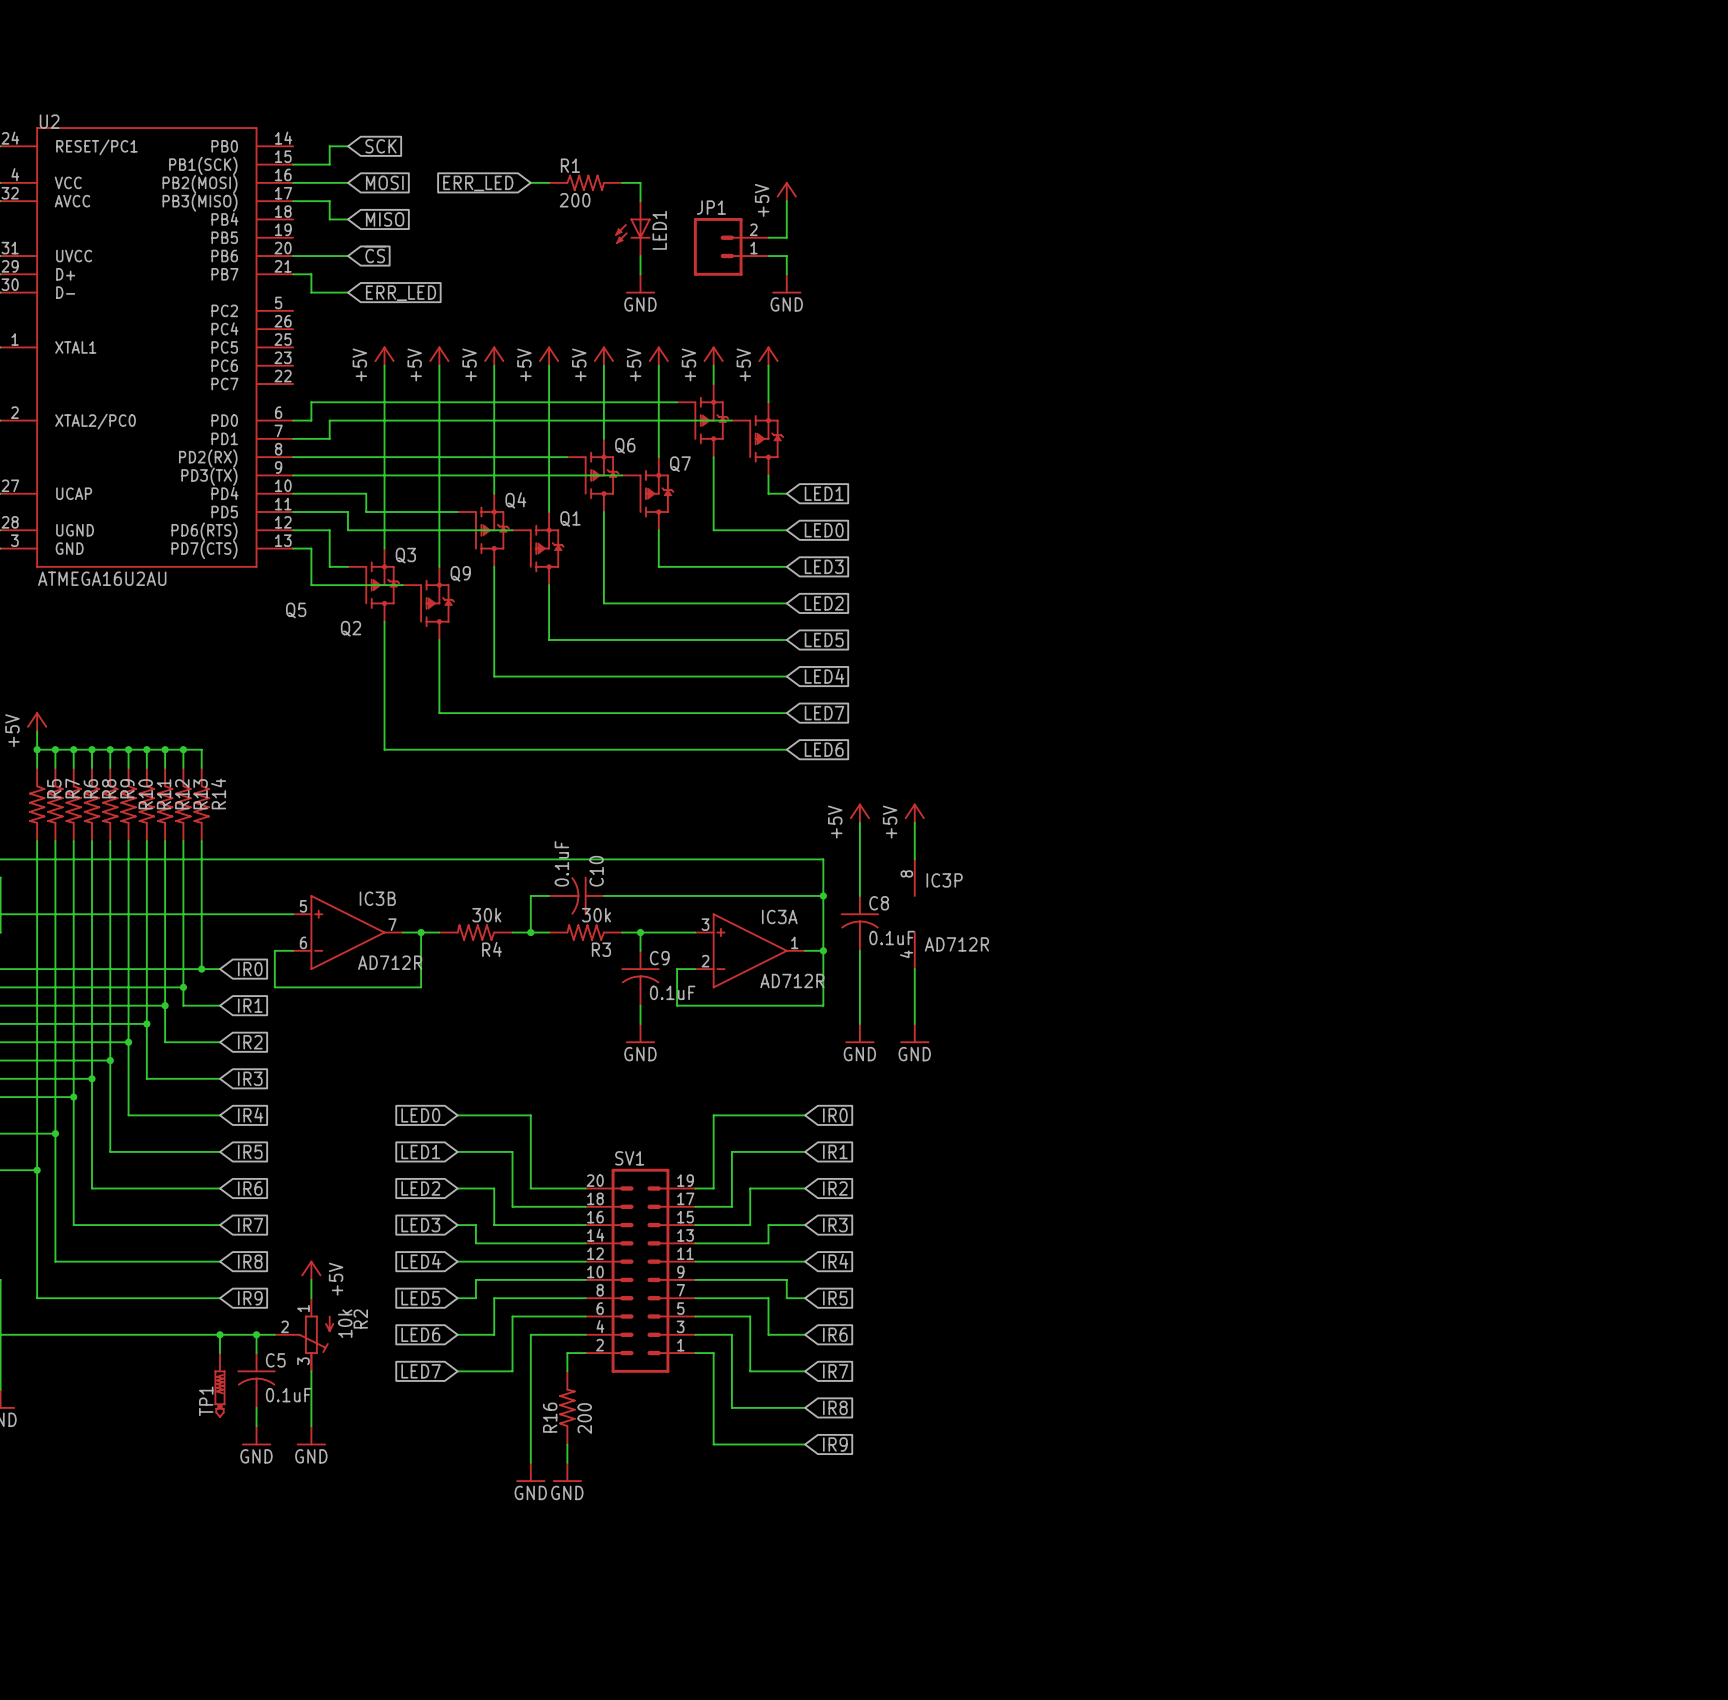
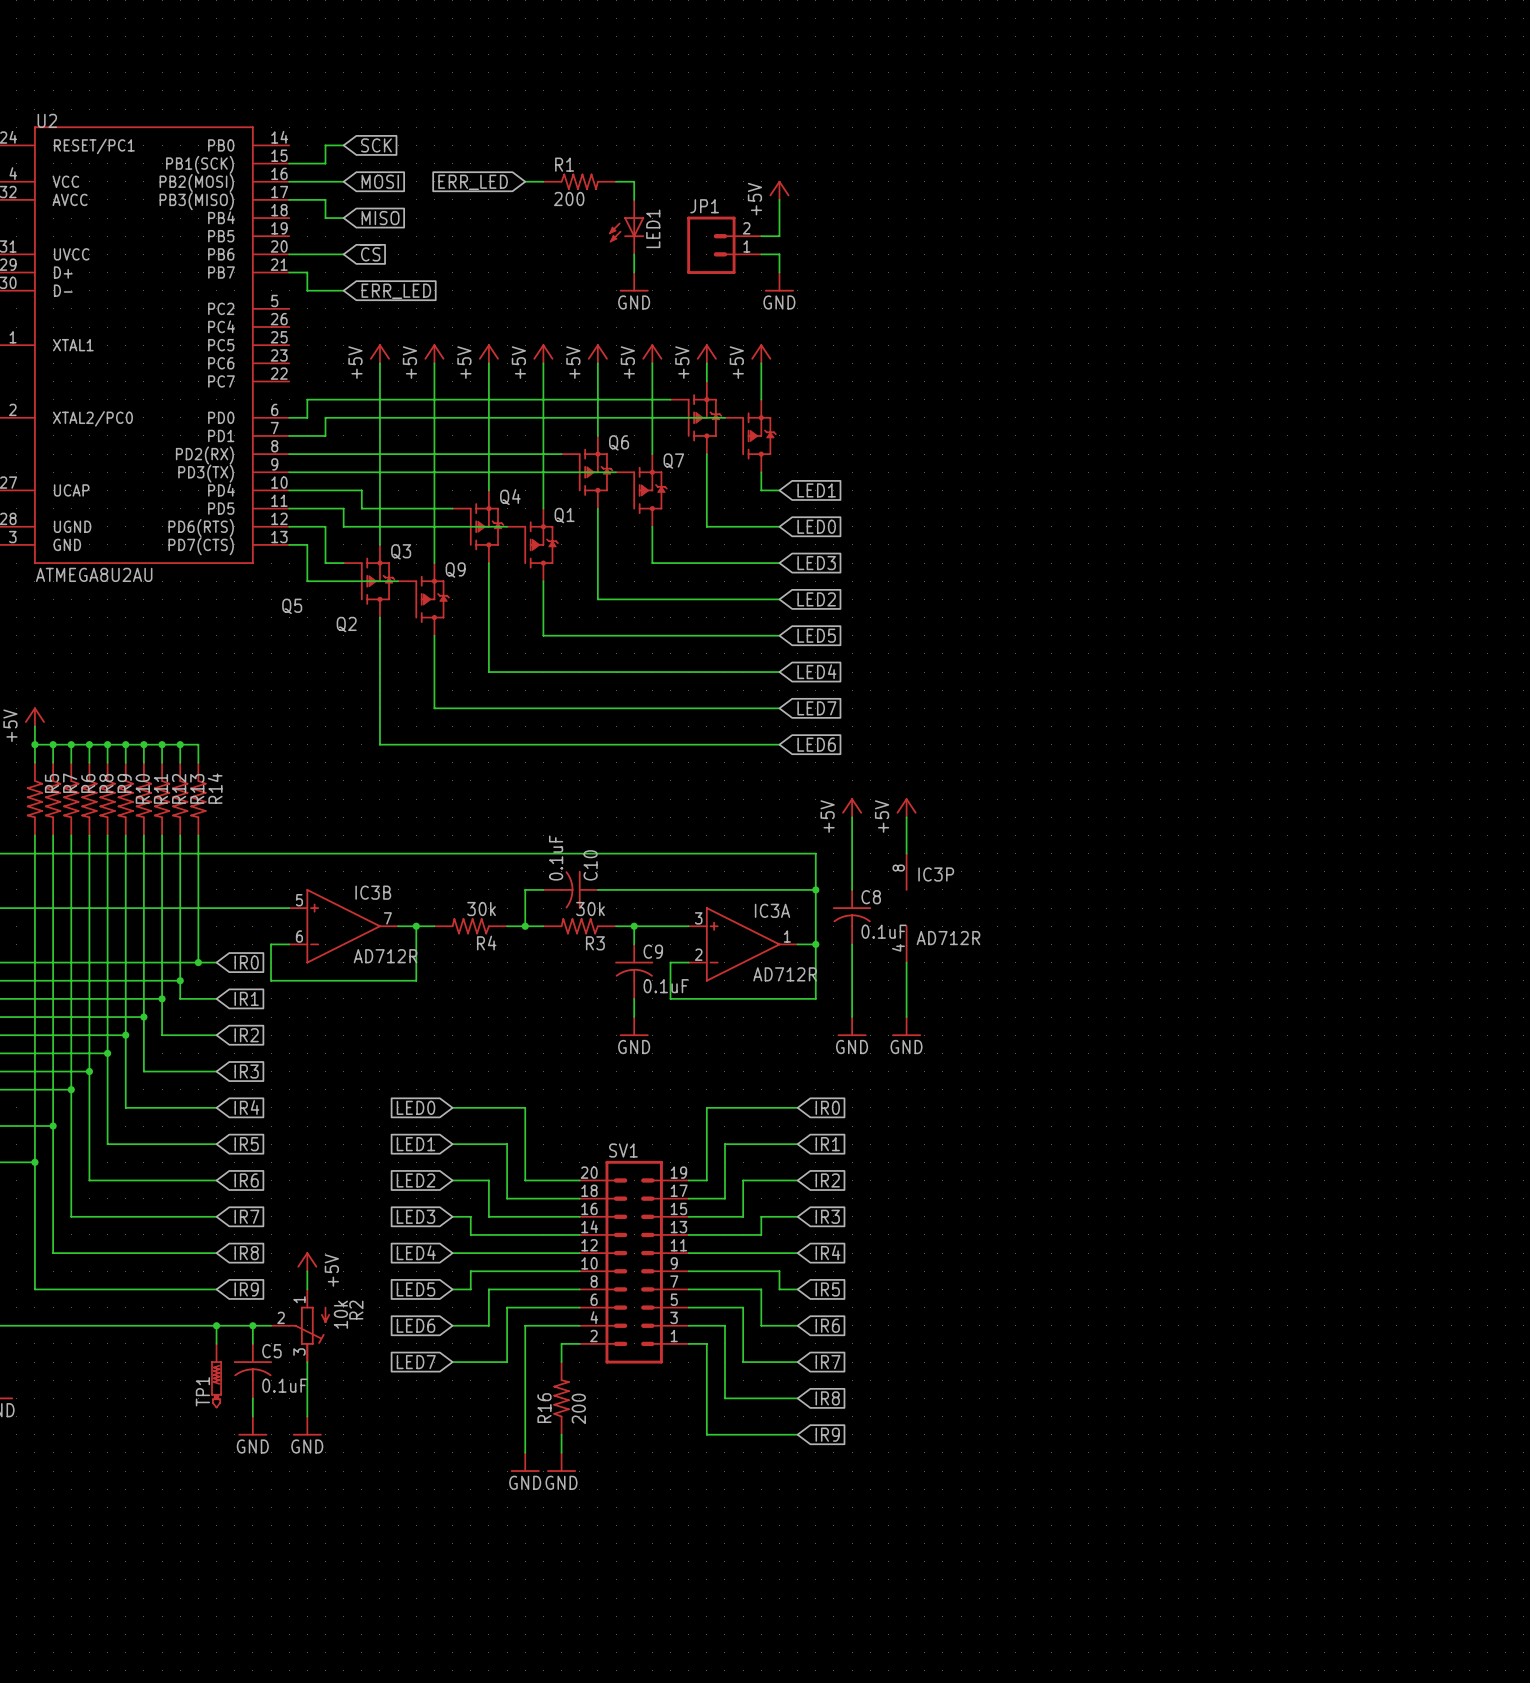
U2 value: ATMEGA16U2AU (102, 578) -> ATMEGA8U2AU (94, 574)

